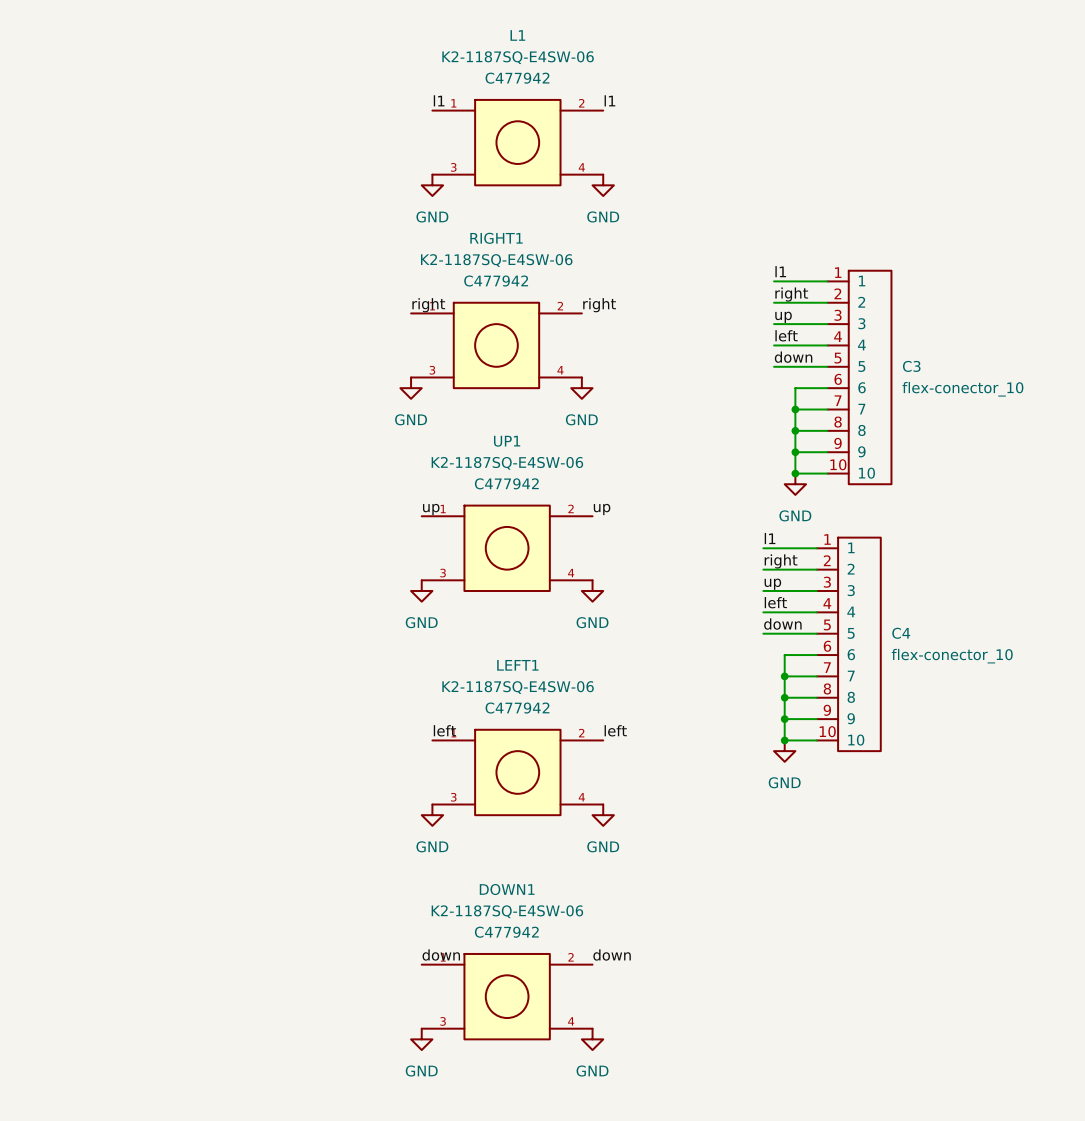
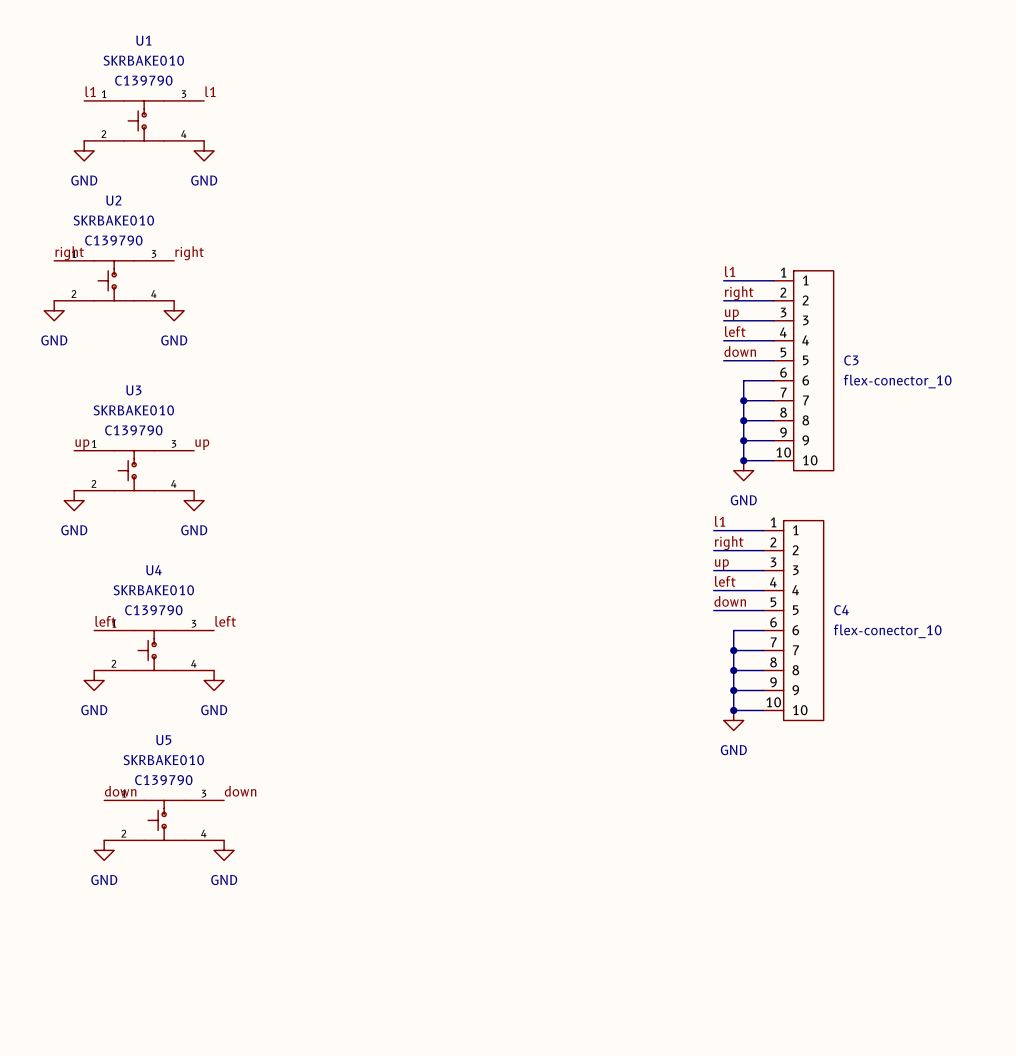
label: none -> l1 (90, 91)
label: none -> l1 (210, 91)
label: l1 (439, 100) -> none
label: l1 (609, 100) -> none
U1: none -> SKRBAKE010 (144, 120)
power symbol: none -> GND (84, 150)
power symbol: none -> GND (204, 150)
L1: K2-1187SQ-E4SW-06 (517, 142) -> none
power symbol: GND (432, 185) -> none
power symbol: GND (603, 185) -> none
label: none -> right (69, 253)
label: none -> right (189, 253)
U2: none -> SKRBAKE010 (114, 280)
label: right (428, 305) -> none
label: right (599, 305) -> none
power symbol: none -> GND (54, 310)
power symbol: none -> GND (174, 310)
RIGHT1: K2-1187SQ-E4SW-06 (496, 345) -> none
power symbol: GND (411, 388) -> none
power symbol: GND (581, 388) -> none
label: none -> up (82, 444)
label: none -> up (202, 444)
U3: none -> SKRBAKE010 (134, 470)
label: up (431, 509) -> none
label: up (602, 509) -> none
power symbol: none -> GND (74, 500)
power symbol: none -> GND (194, 500)
UP1: K2-1187SQ-E4SW-06 (507, 548) -> none
power symbol: GND (421, 590) -> none
power symbol: GND (592, 590) -> none
label: none -> left (105, 621)
label: none -> left (225, 621)
U4: none -> SKRBAKE010 (154, 650)
power symbol: none -> GND (94, 680)
power symbol: none -> GND (214, 680)
label: left (444, 730) -> none
label: left (615, 730) -> none
LEFT1: K2-1187SQ-E4SW-06 (517, 772) -> none
power symbol: GND (432, 815) -> none
power symbol: GND (603, 815) -> none
label: none -> down (120, 791)
label: none -> down (240, 791)
U5: none -> SKRBAKE010 (164, 820)
power symbol: none -> GND (104, 850)
power symbol: none -> GND (224, 850)
label: down (441, 954) -> none
label: down (612, 954) -> none
DOWN1: K2-1187SQ-E4SW-06 (507, 996) -> none
power symbol: GND (421, 1039) -> none
power symbol: GND (592, 1039) -> none

